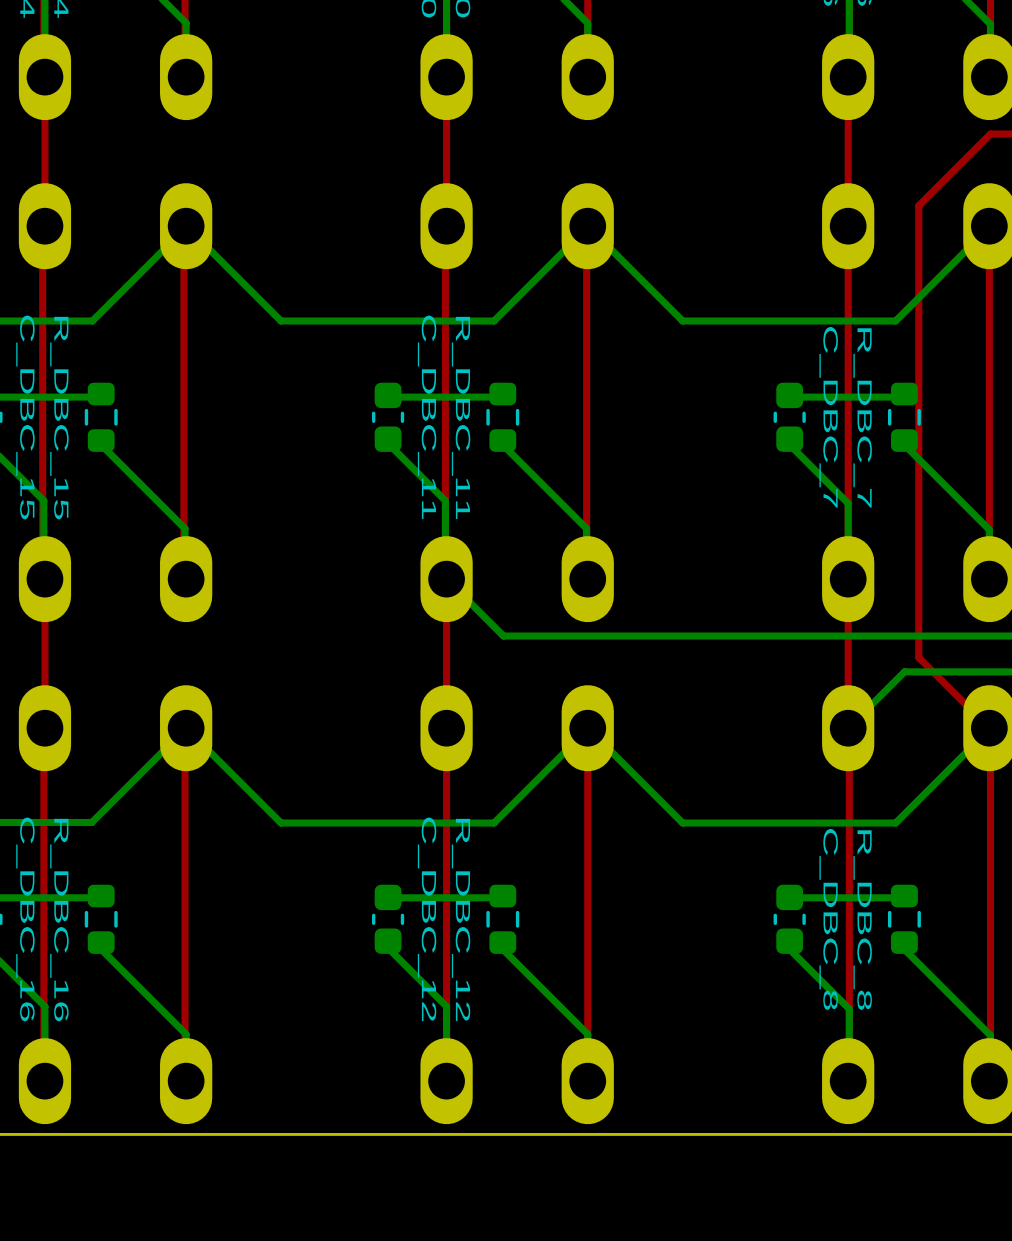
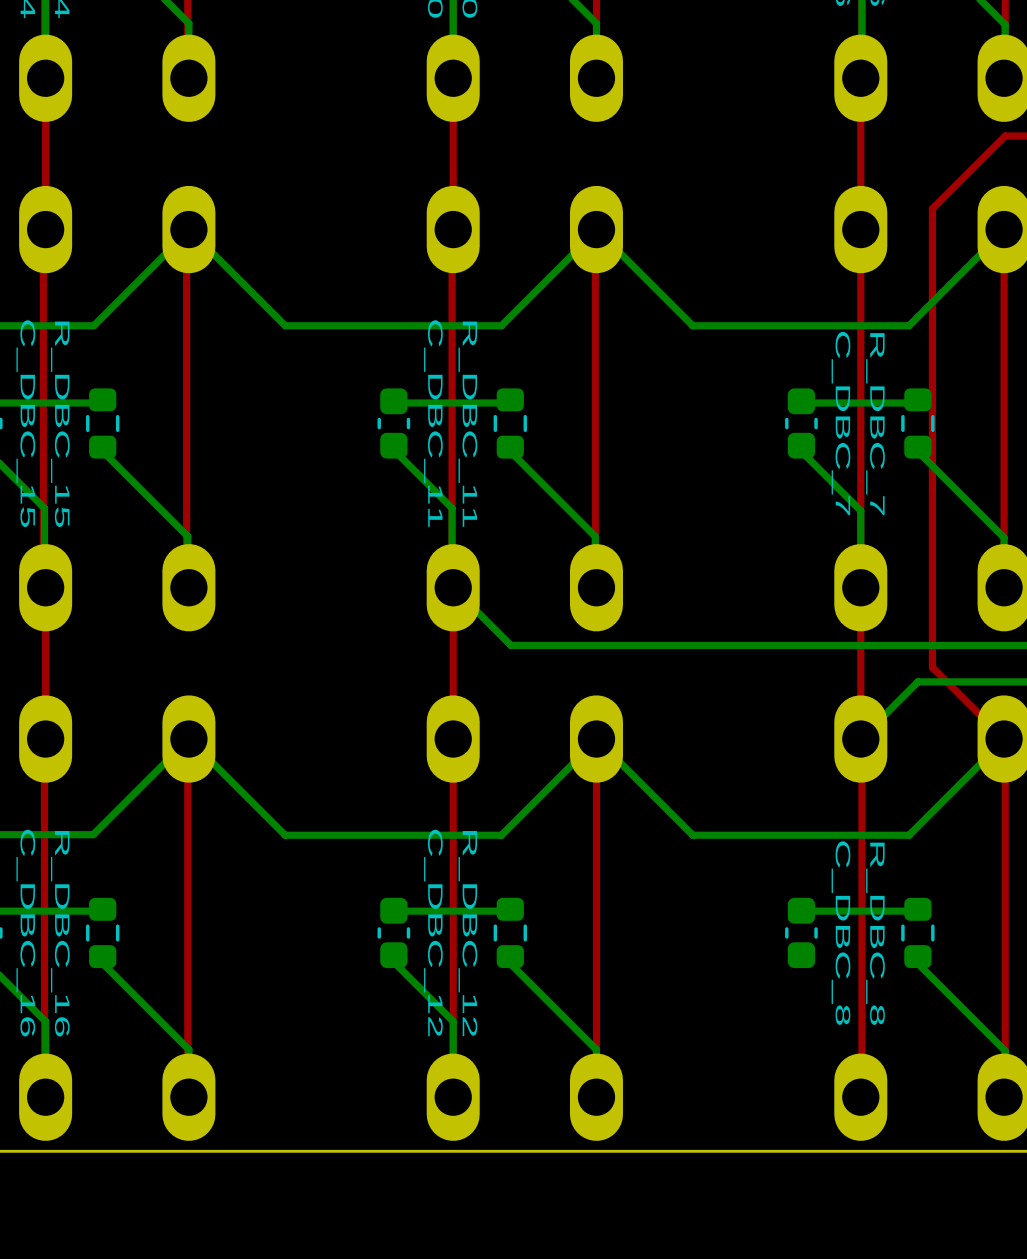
bottom track: (789, 949) (849, 1009) (849, 1087) -> none

